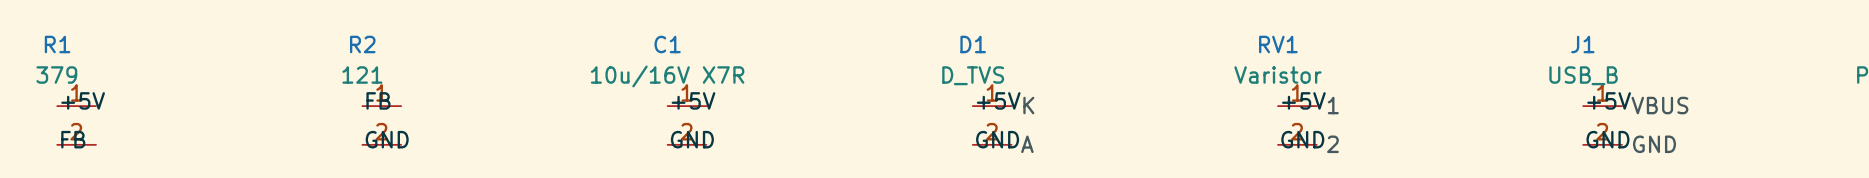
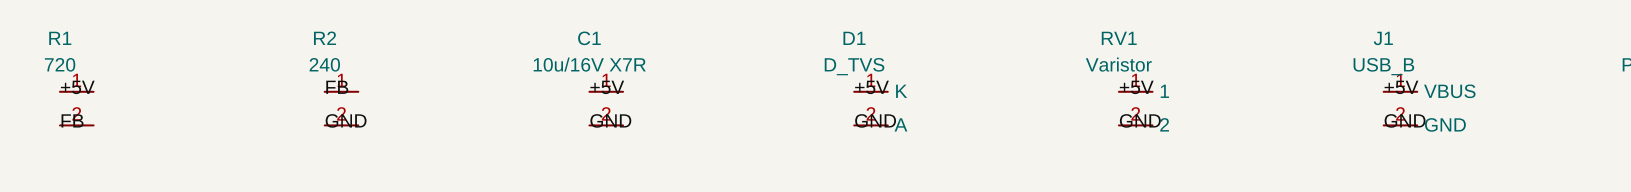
R1 value: 379 (56, 75) -> 720 (60, 64)
R2 value: 121 (362, 75) -> 240 (324, 64)

